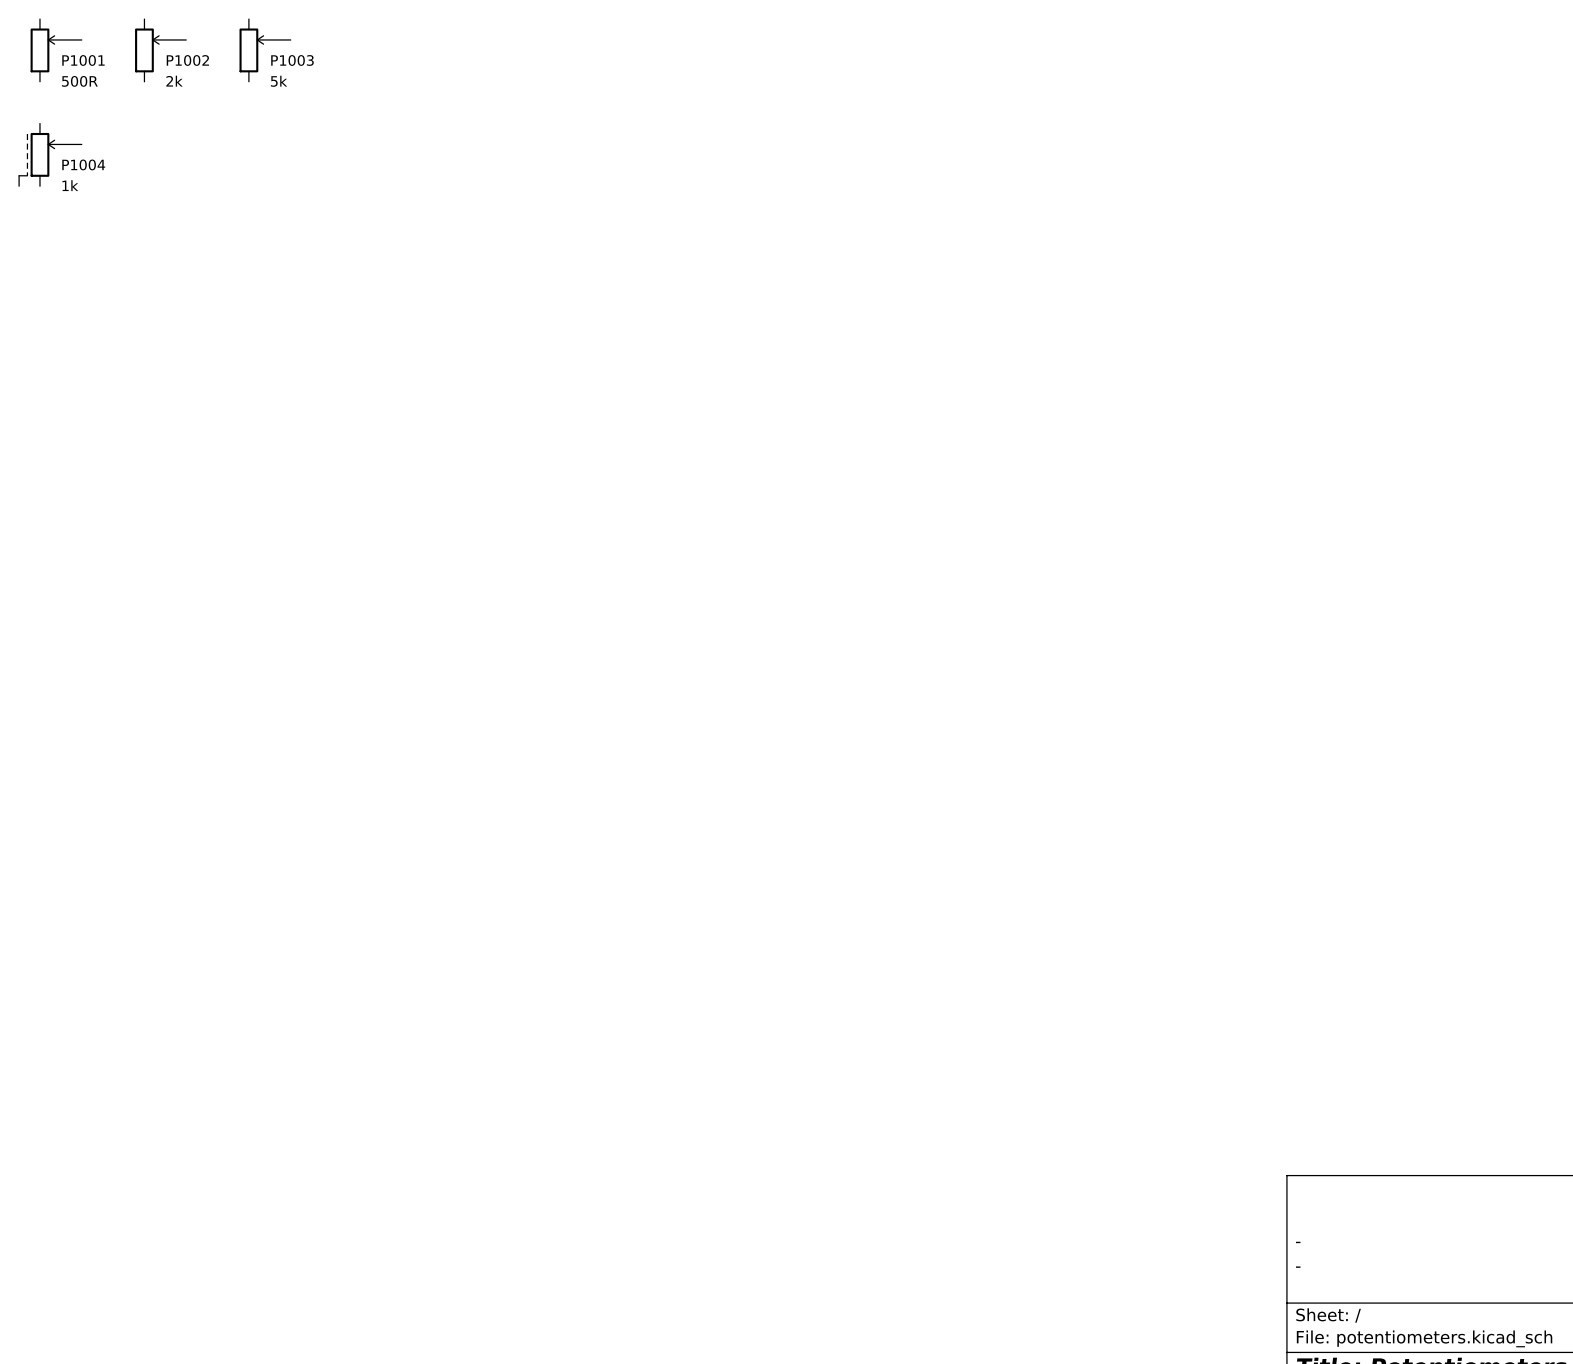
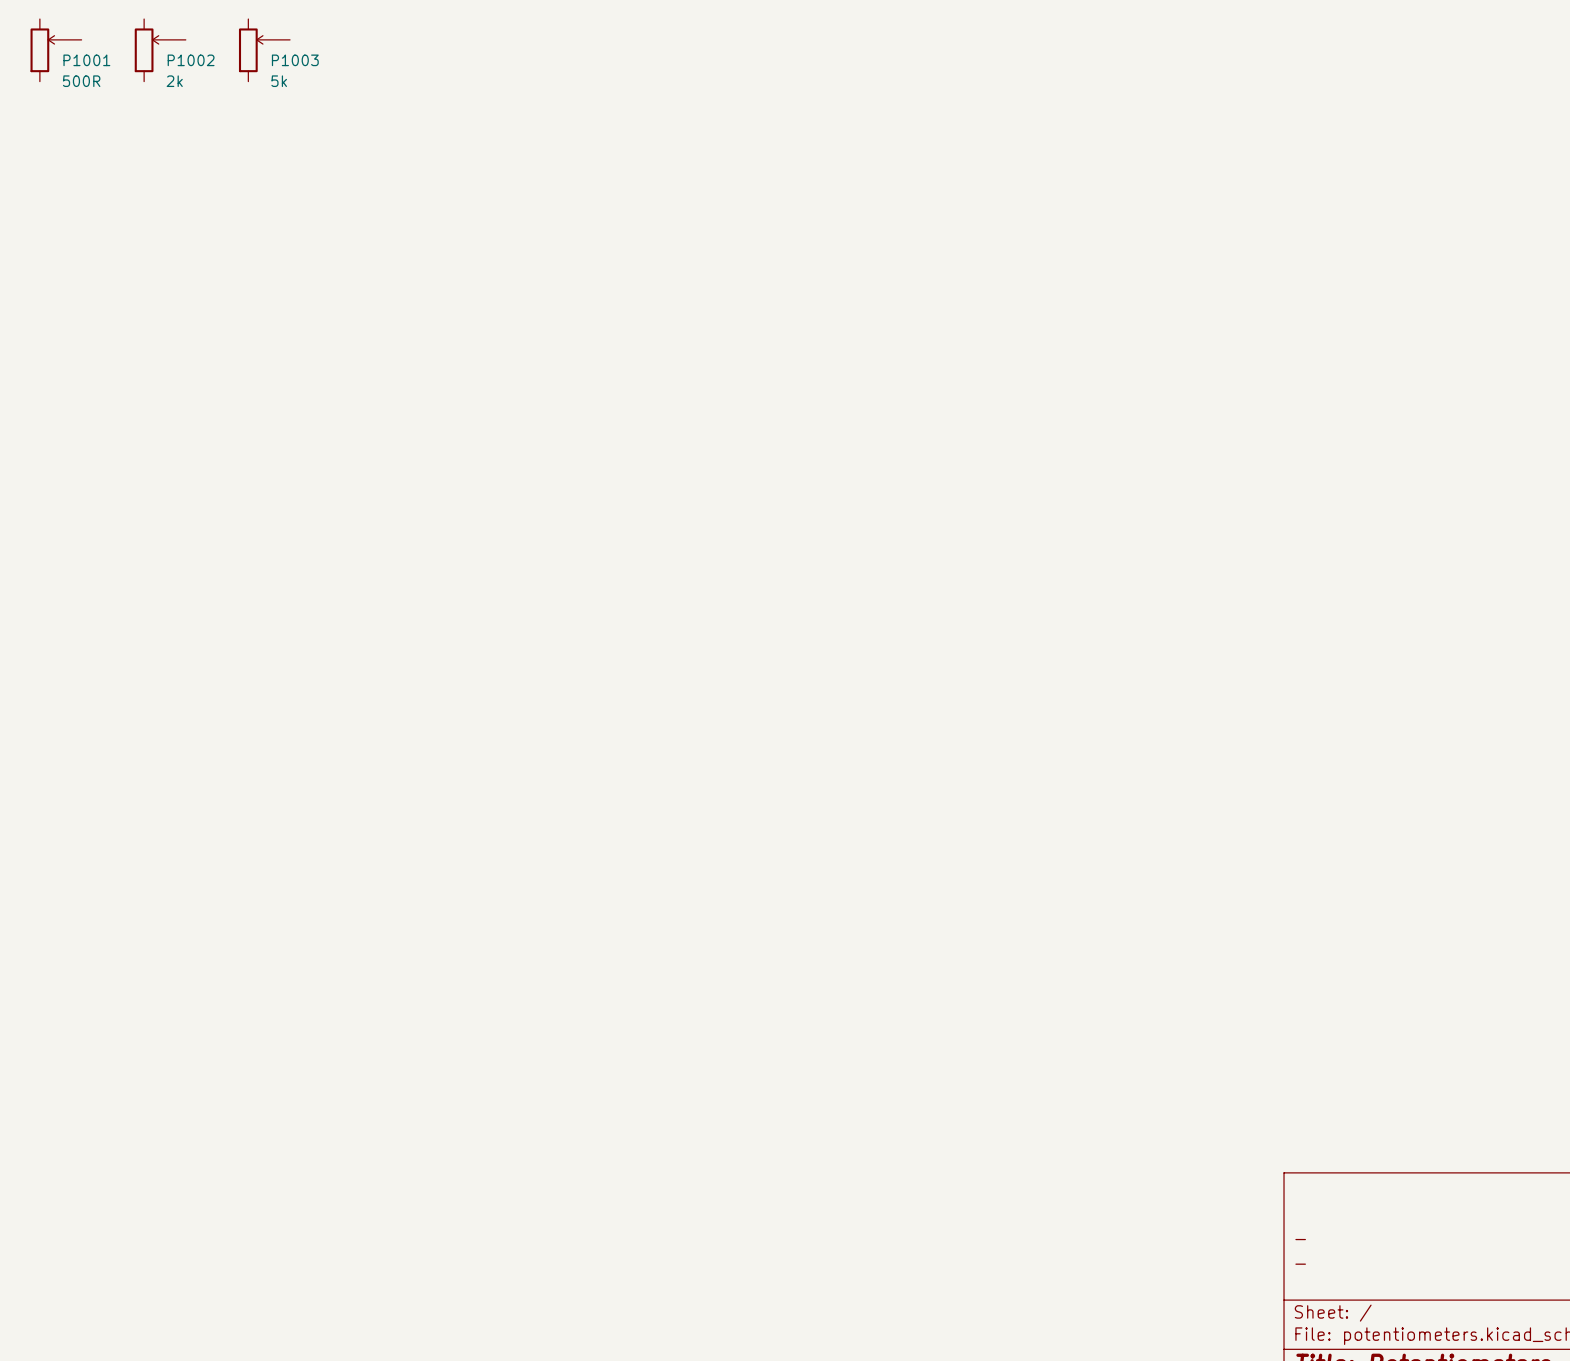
P1004: 1k (50, 154) -> none

